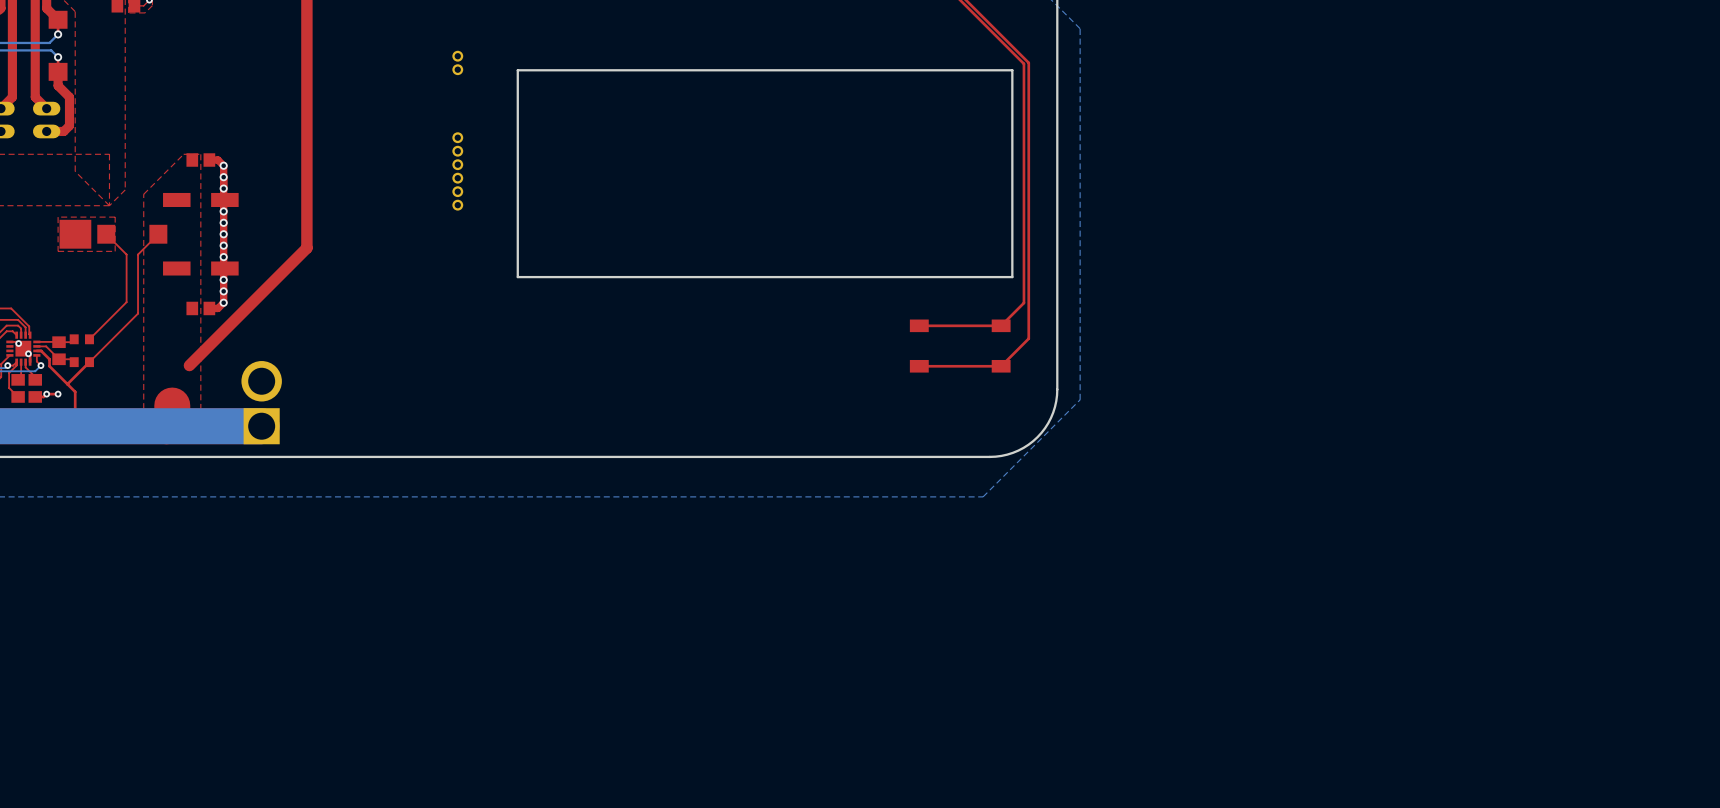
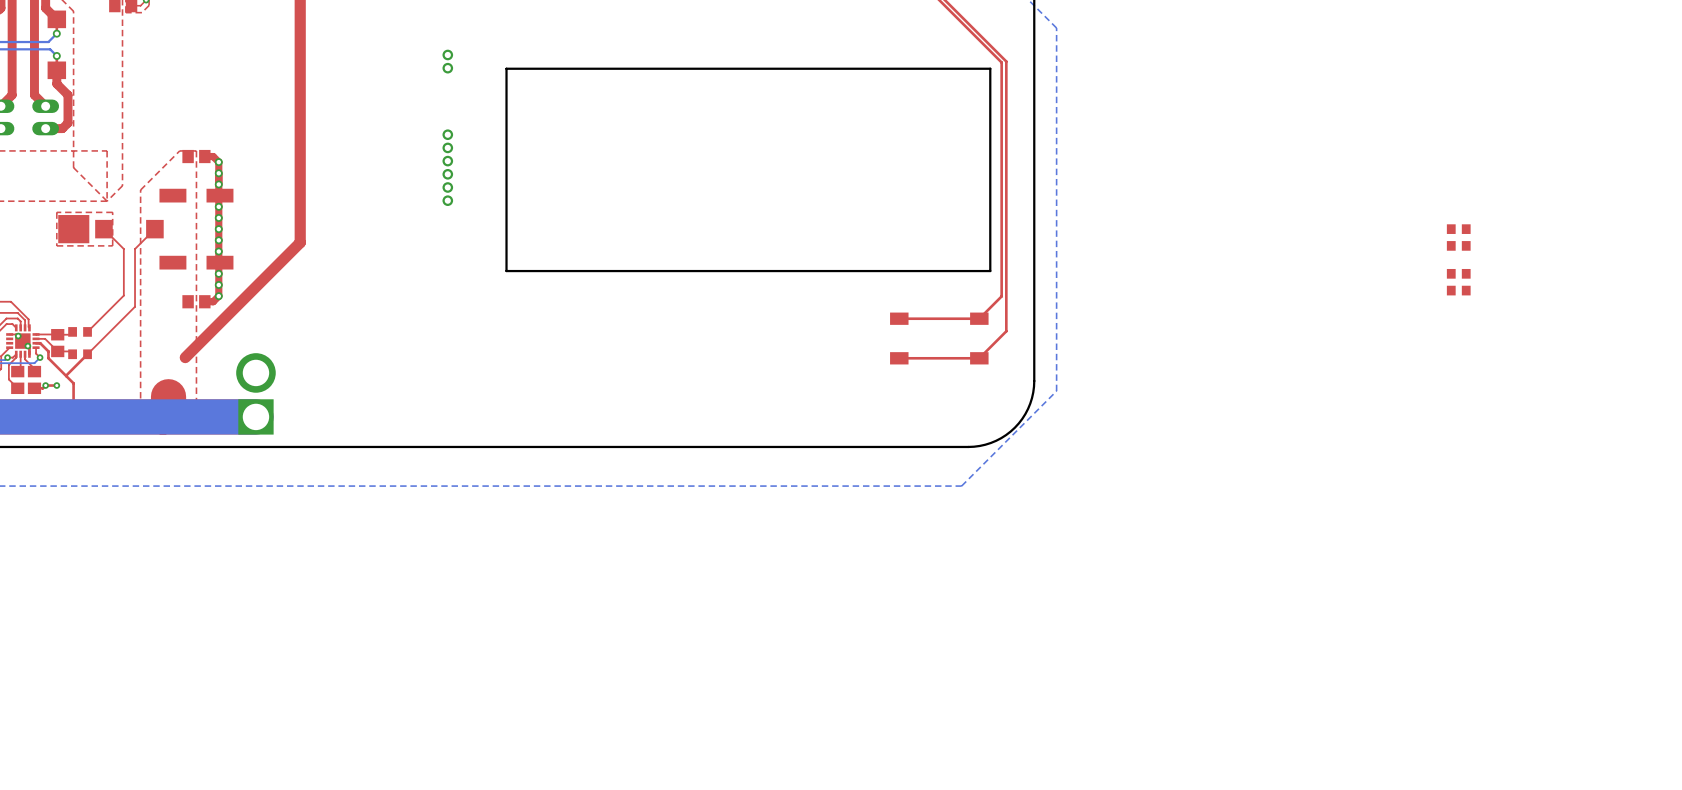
part: none -> (1458, 229)
part: none -> (1458, 245)
part: none -> (1458, 273)
part: none -> (1458, 290)

